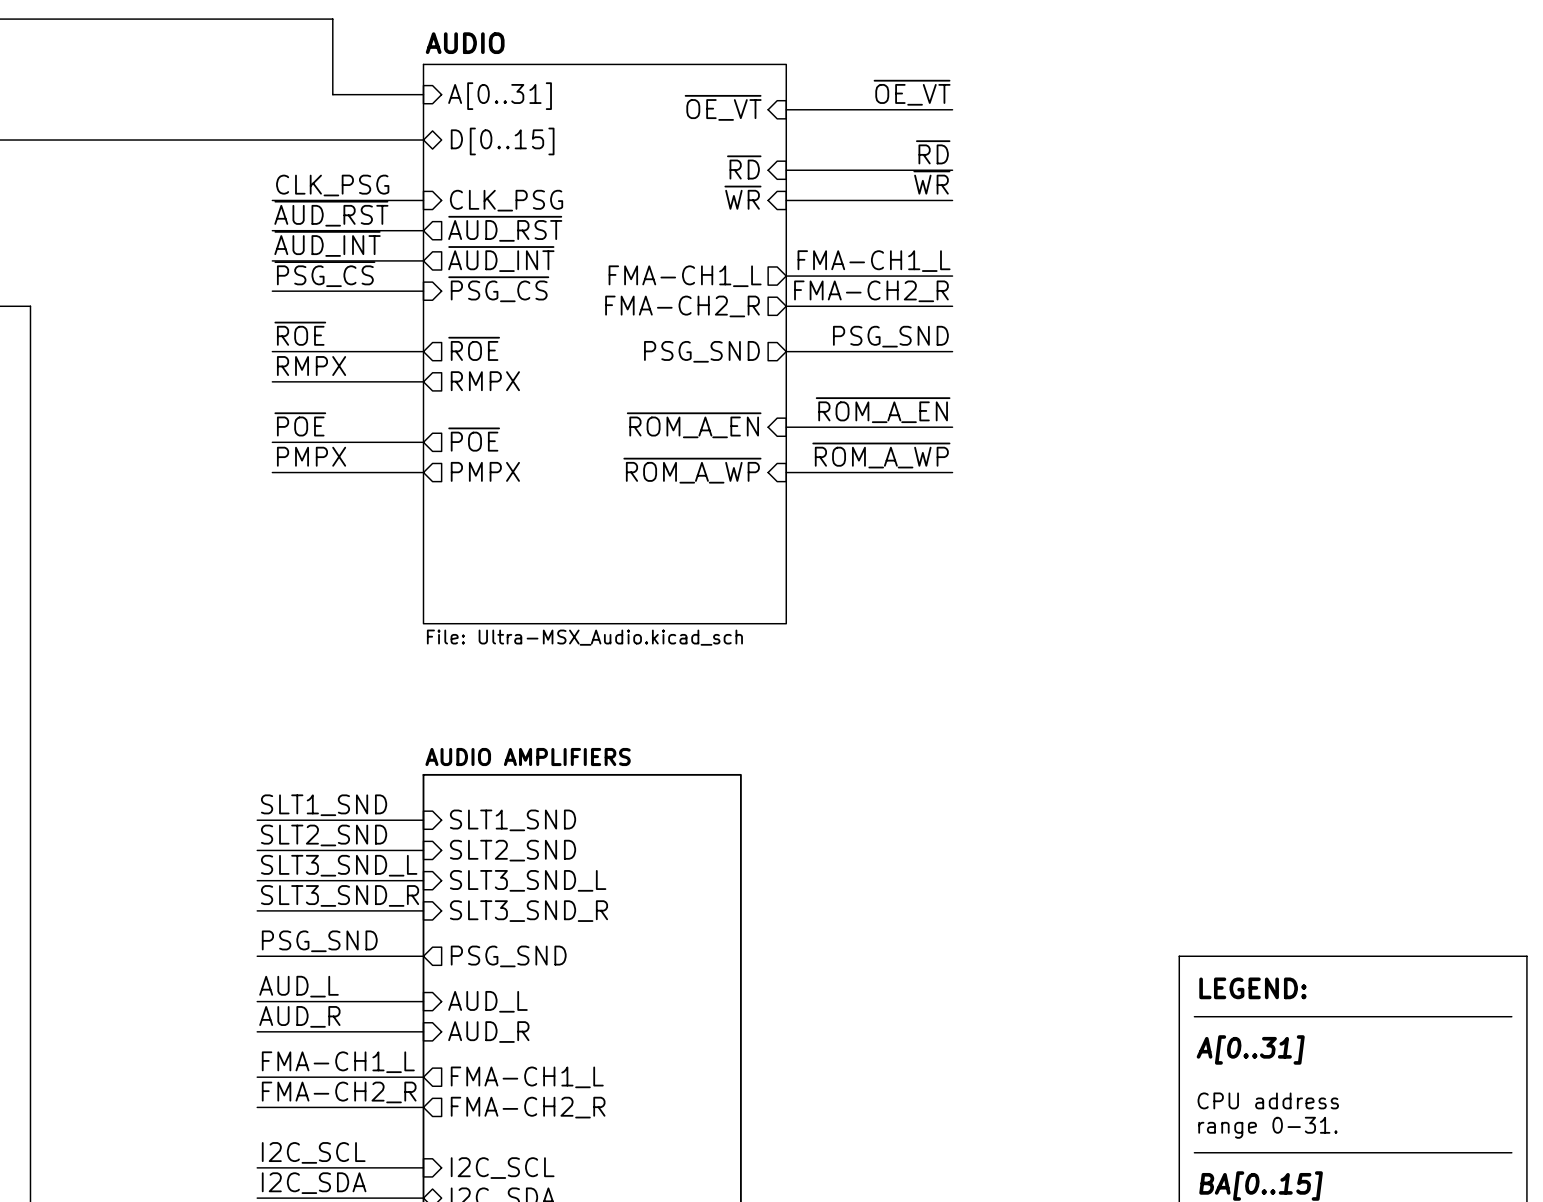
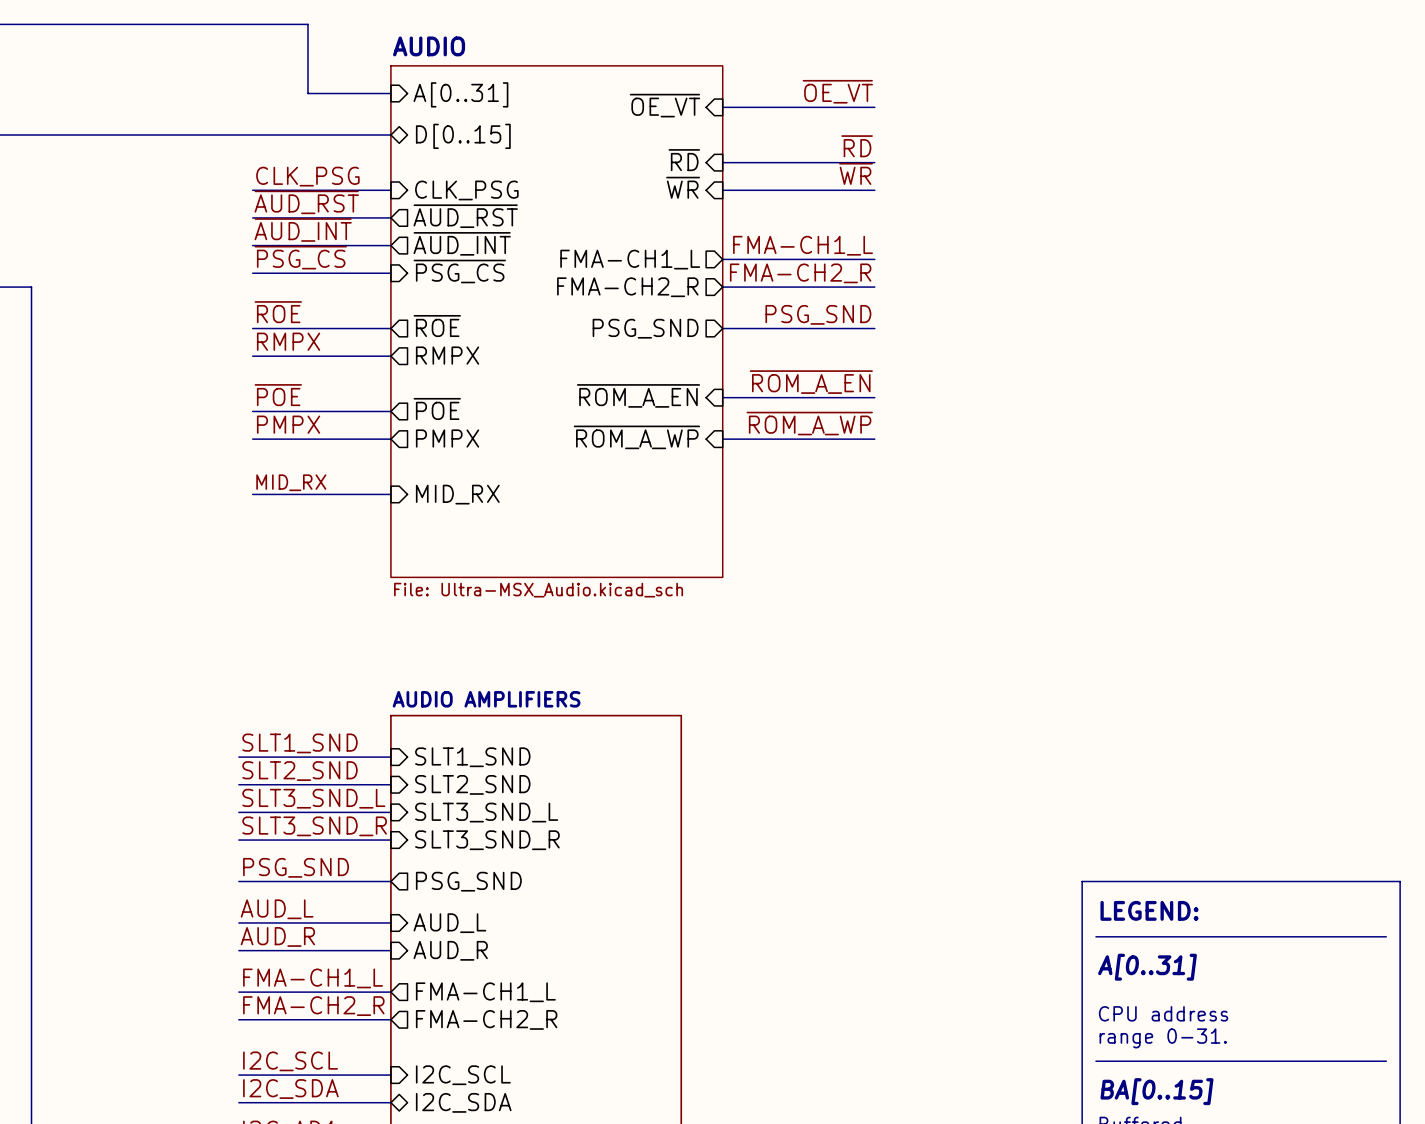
label: none -> MID_RX (291, 482)
wire: none -> (252, 494) (390, 494)
sheet pin: none -> MID_RX (457, 494)

